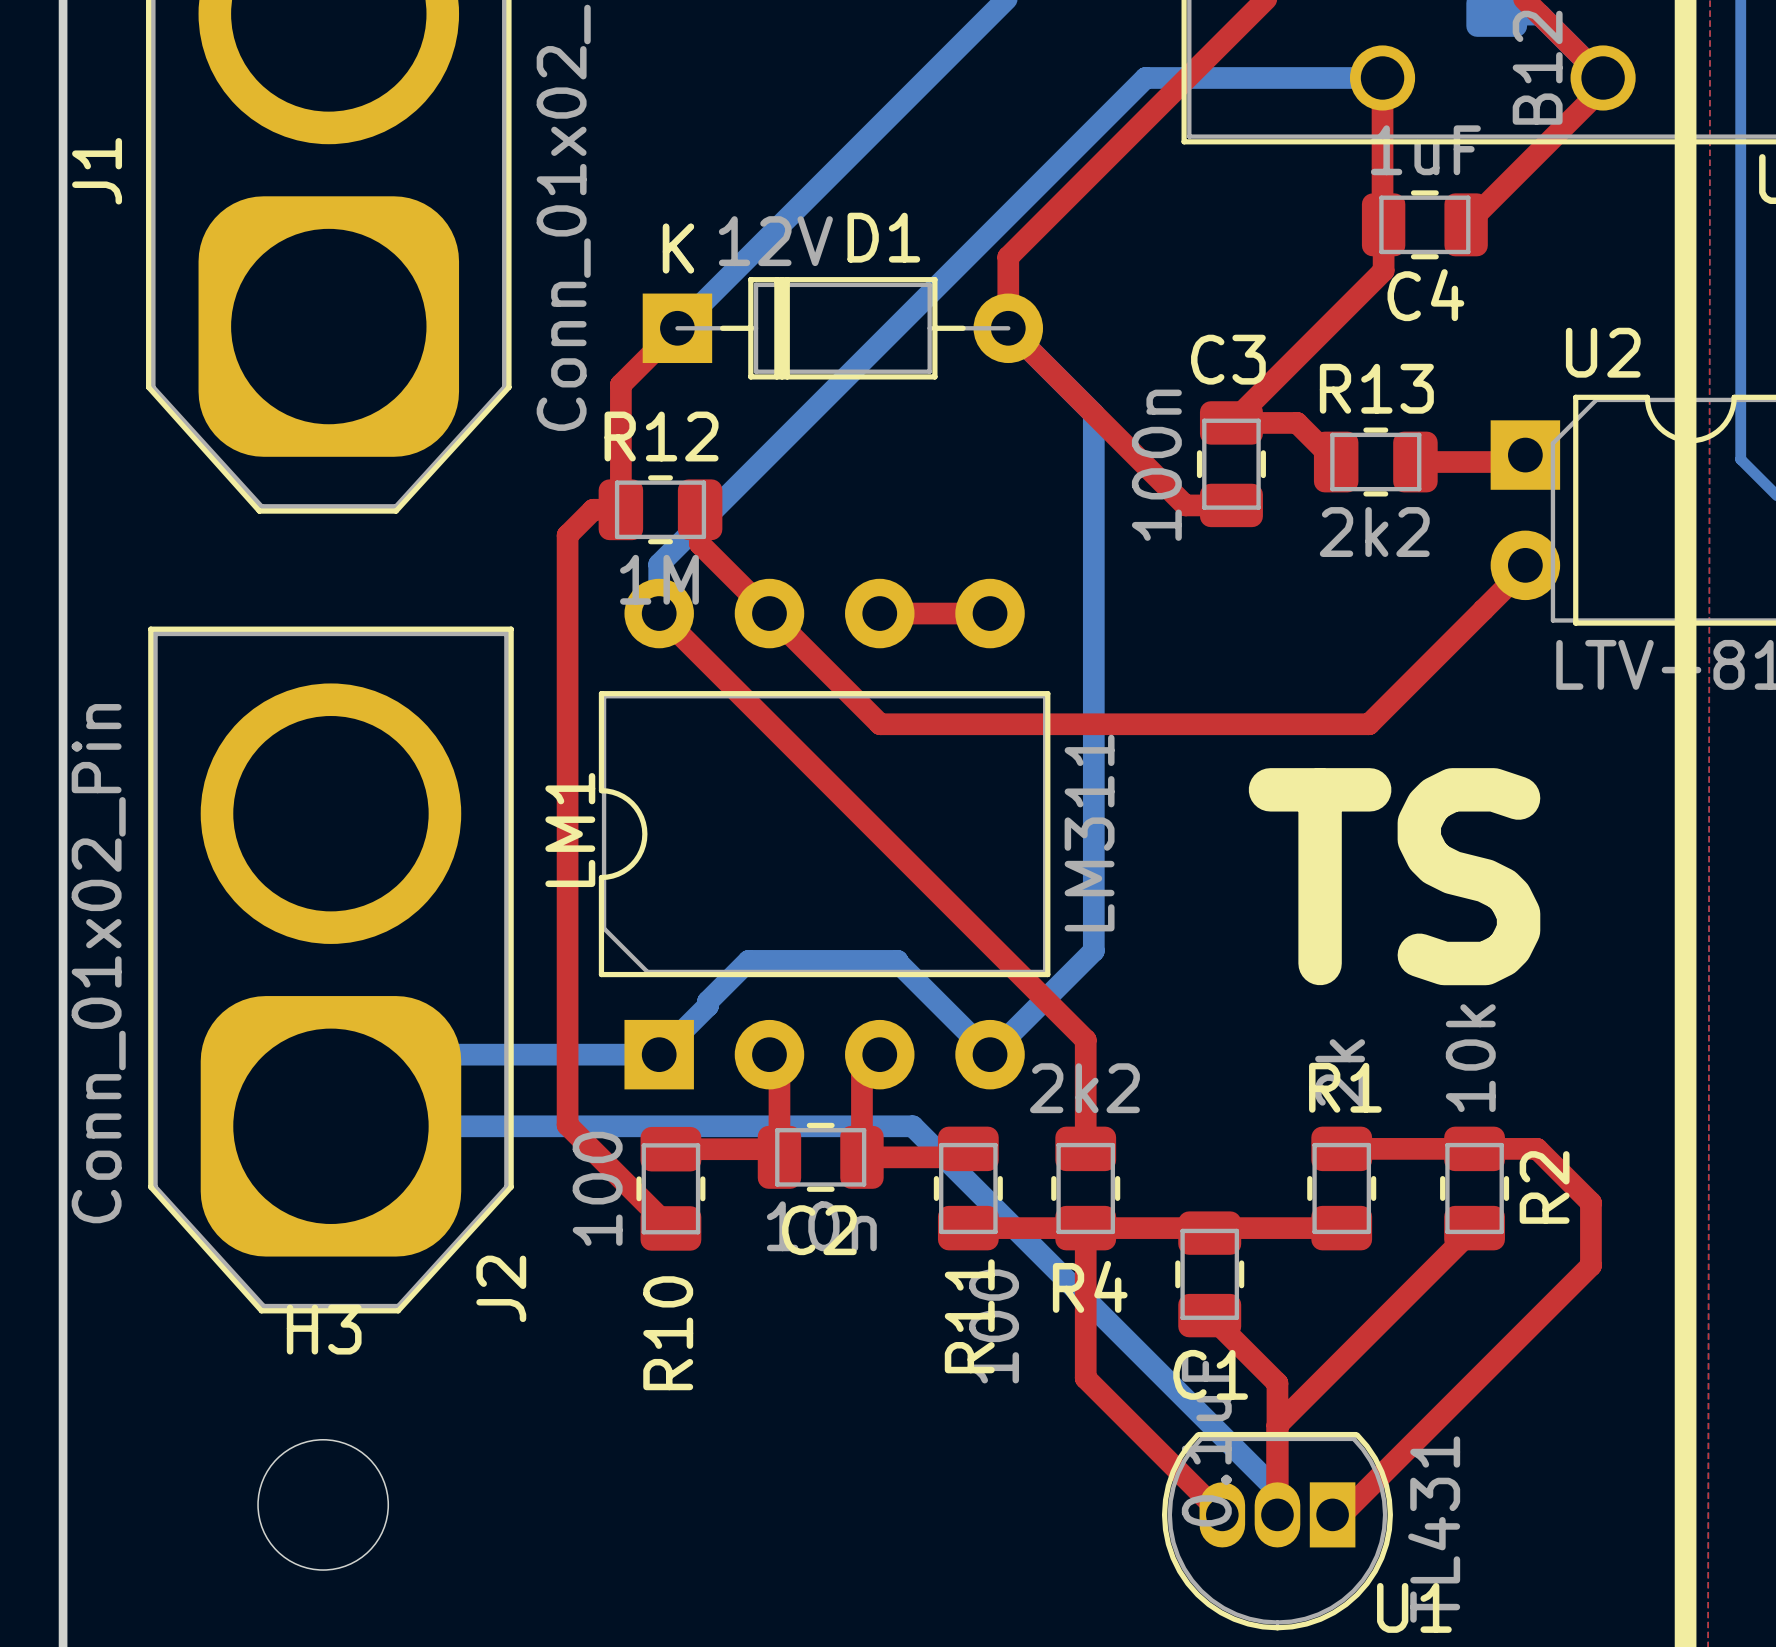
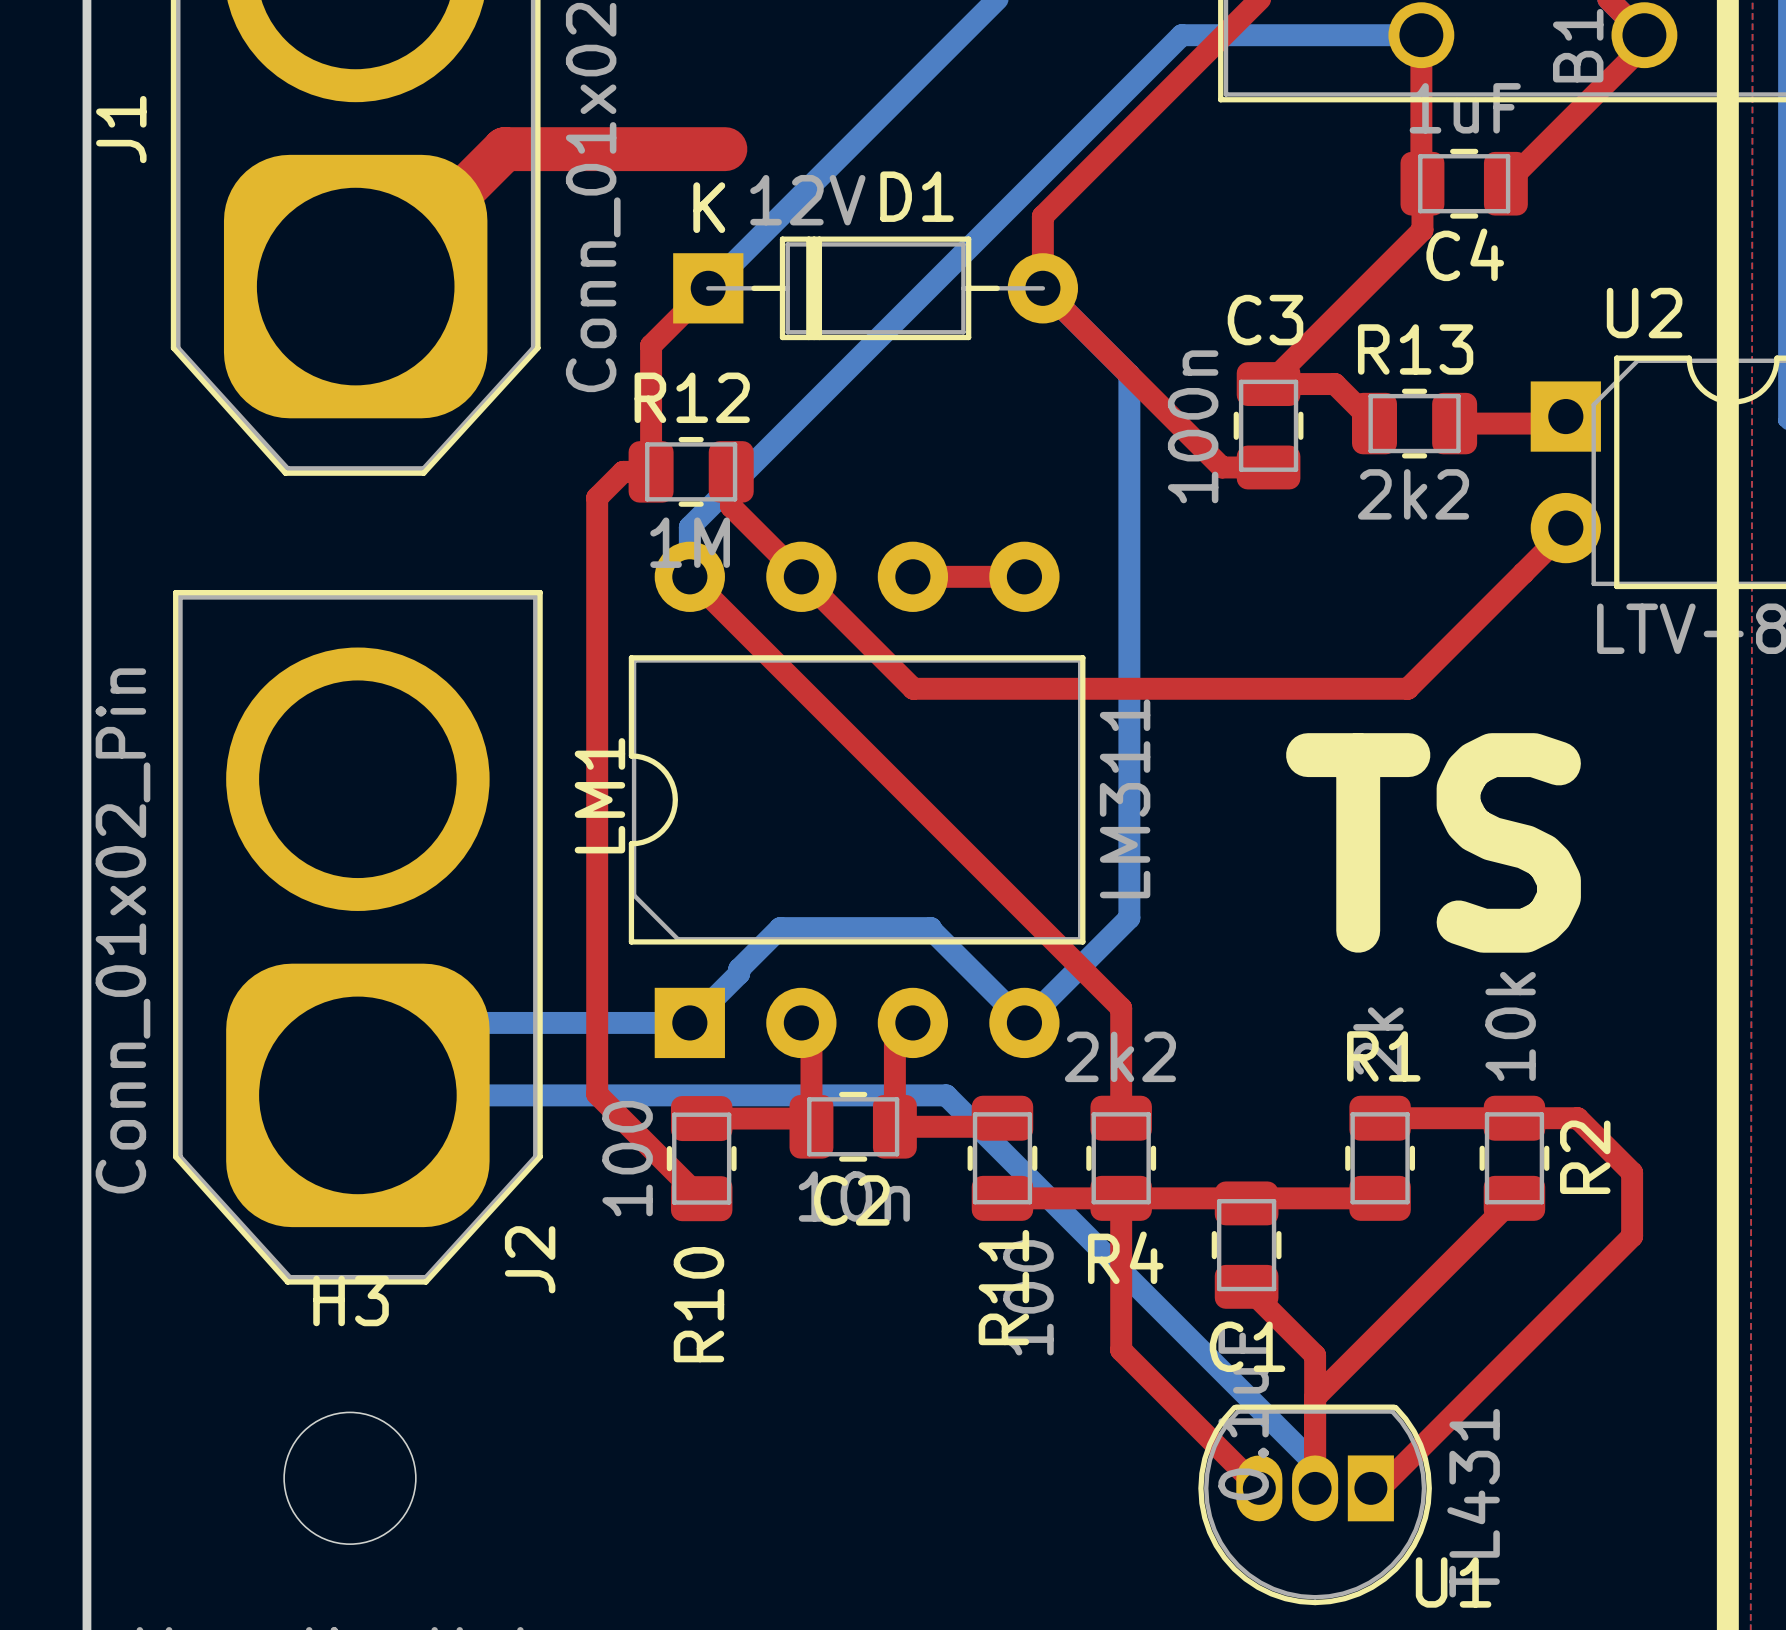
top track: none -> (725, 149) (504, 149) (358, 294)

